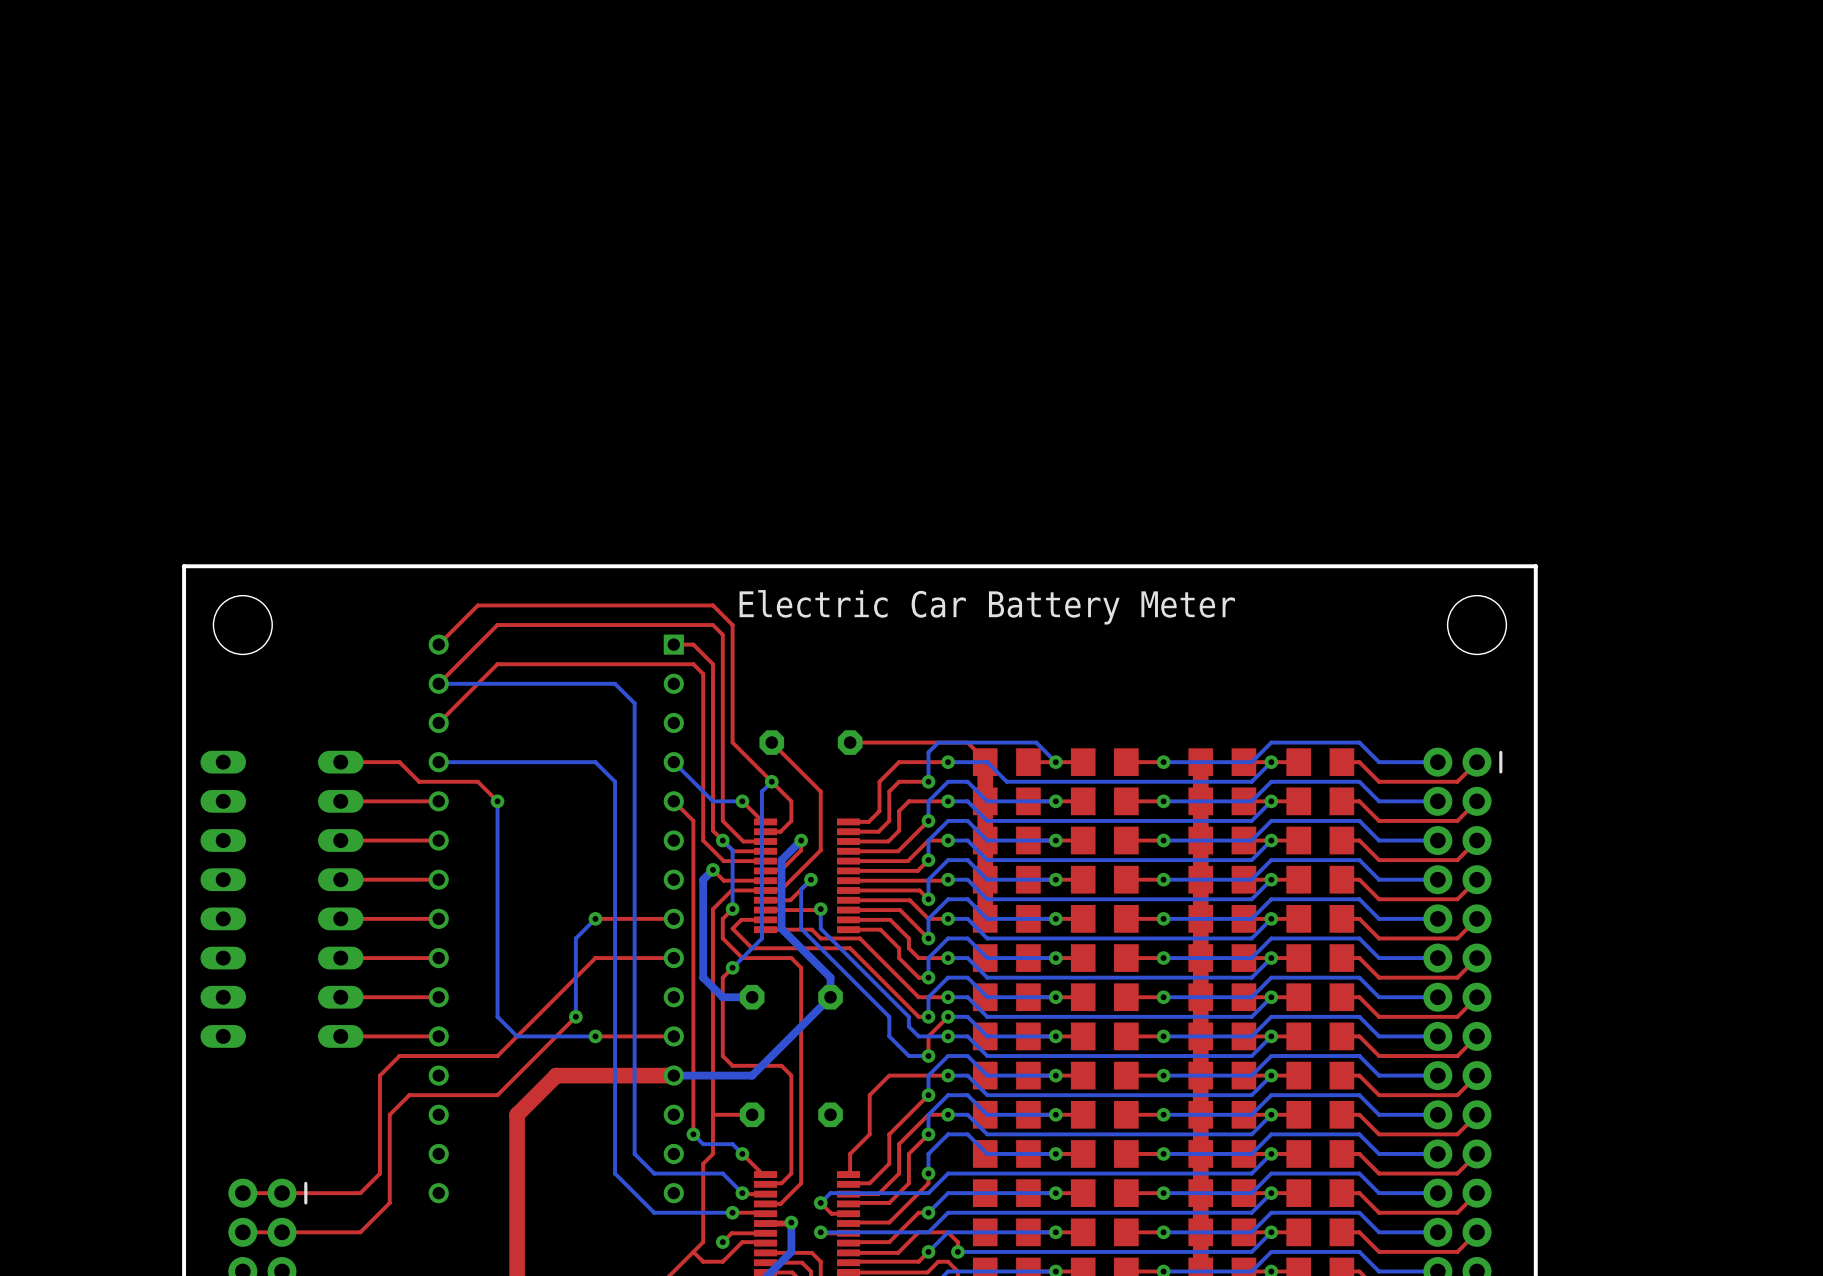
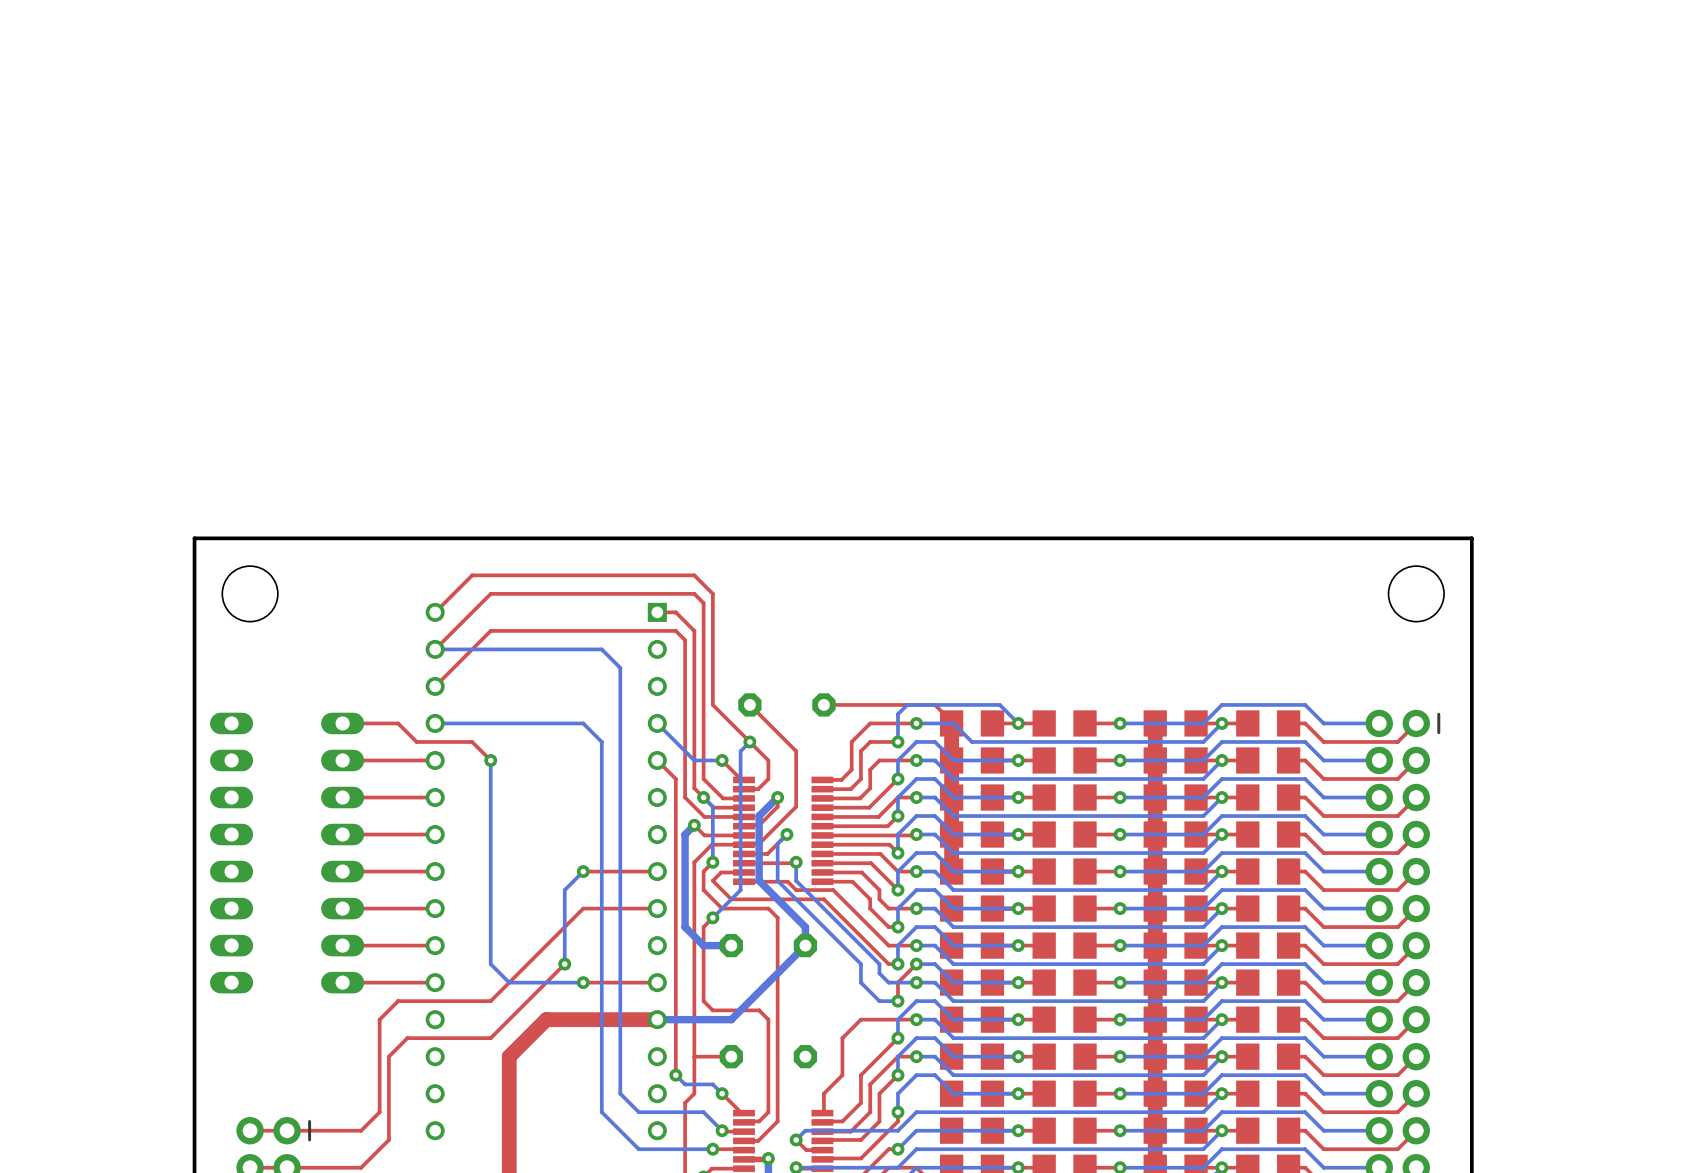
text: Electric Car Battery Meter (987, 607) -> none

